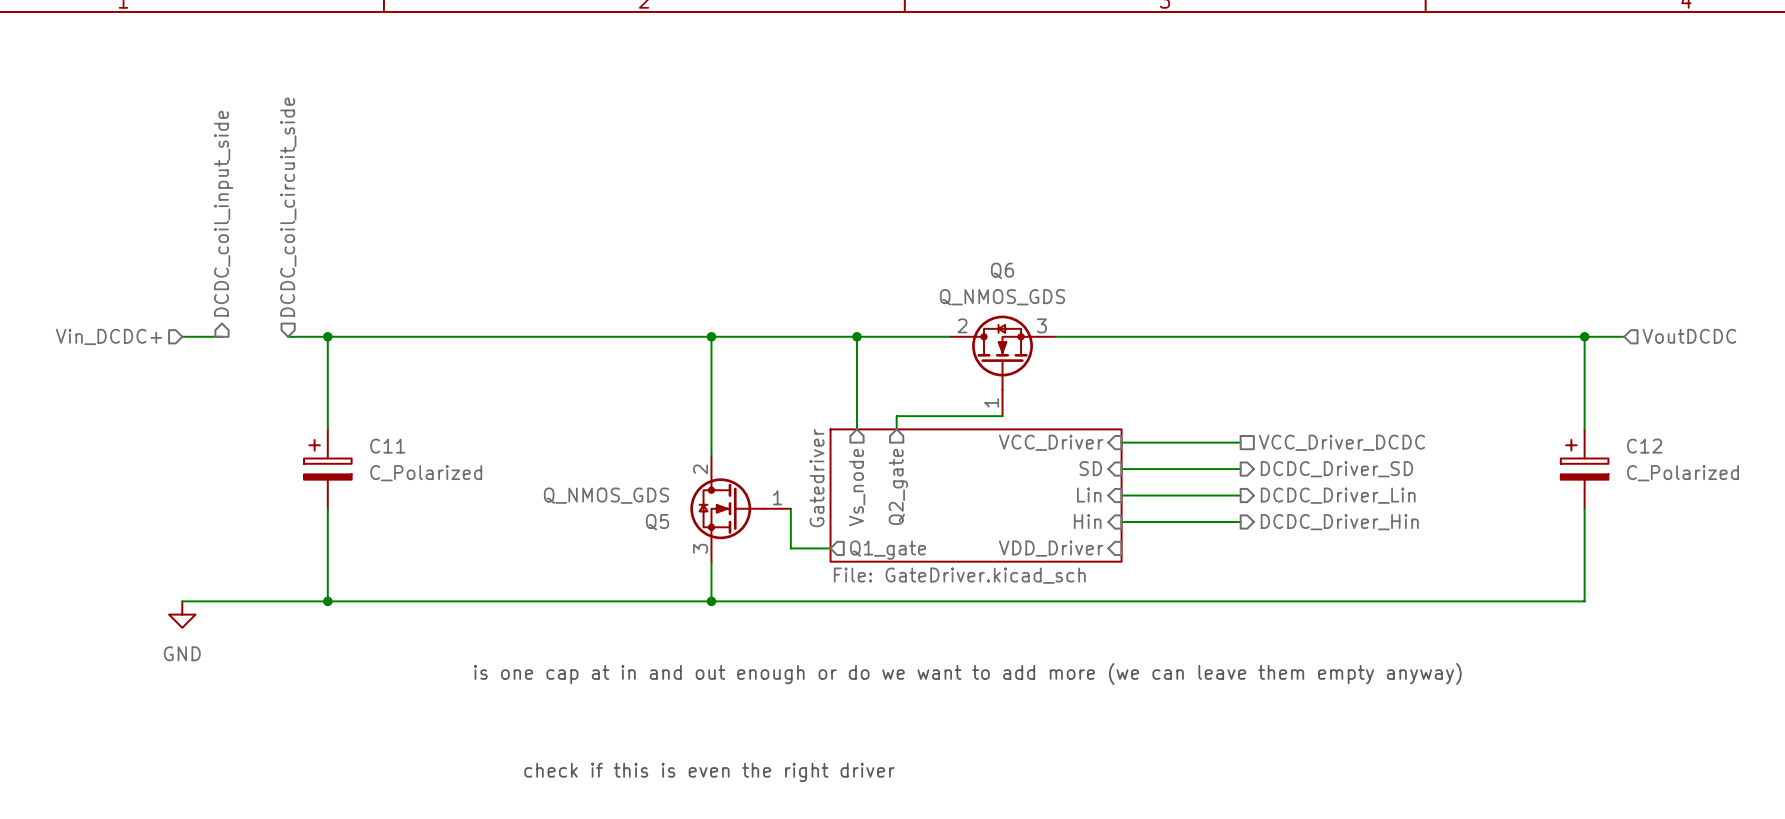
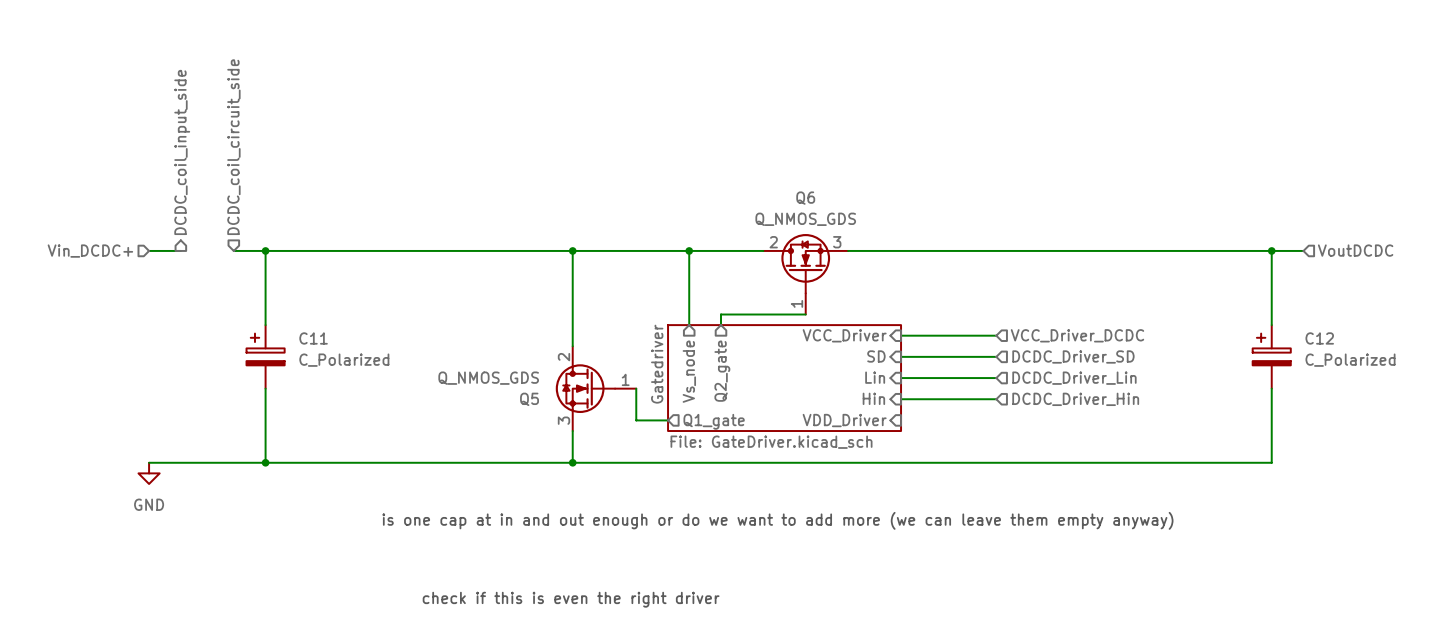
hierarchical label shape: passive (1341, 442) -> input (1077, 335)
hierarchical label shape: output (1336, 469) -> input (1073, 356)
hierarchical label shape: output (1338, 495) -> input (1074, 378)
hierarchical label shape: output (1339, 522) -> input (1075, 399)

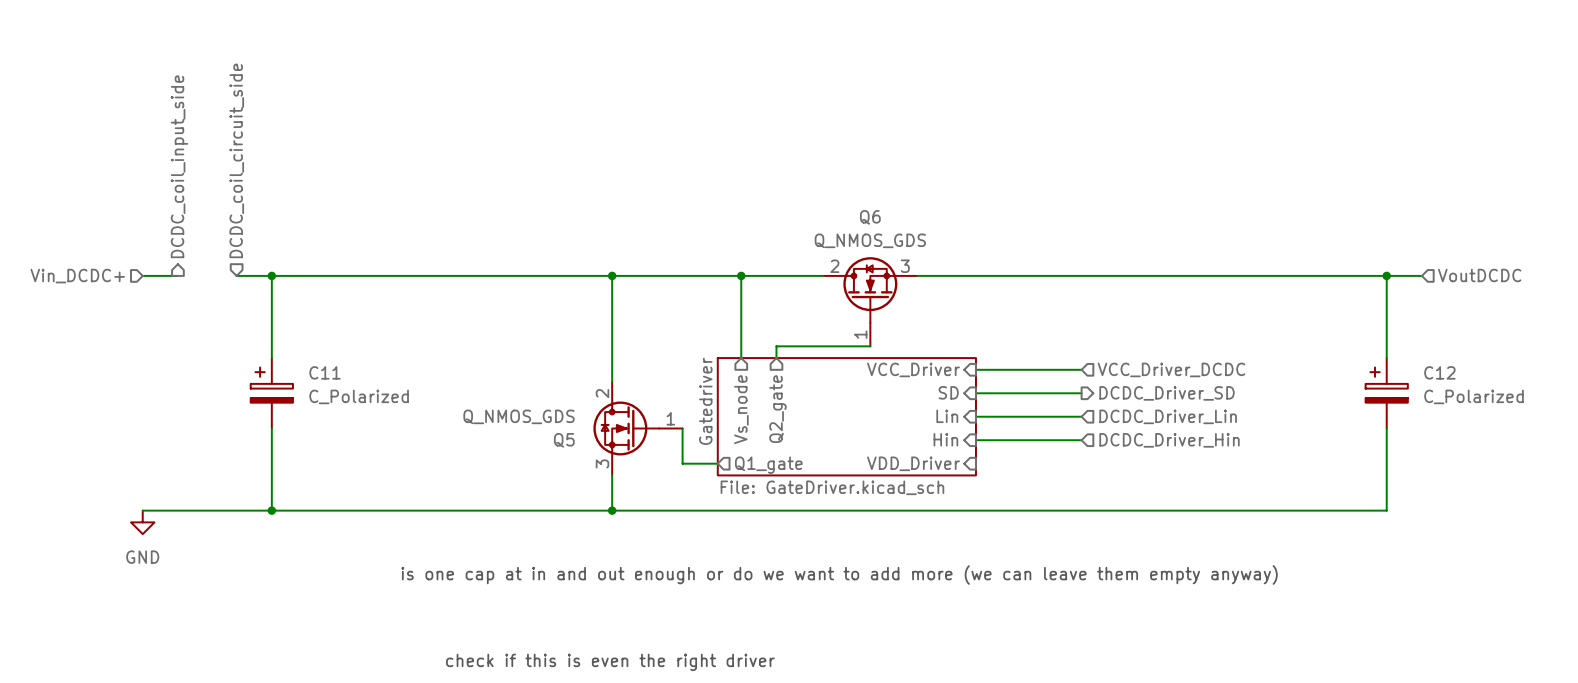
hierarchical label shape: input (1073, 356) -> output (1167, 393)

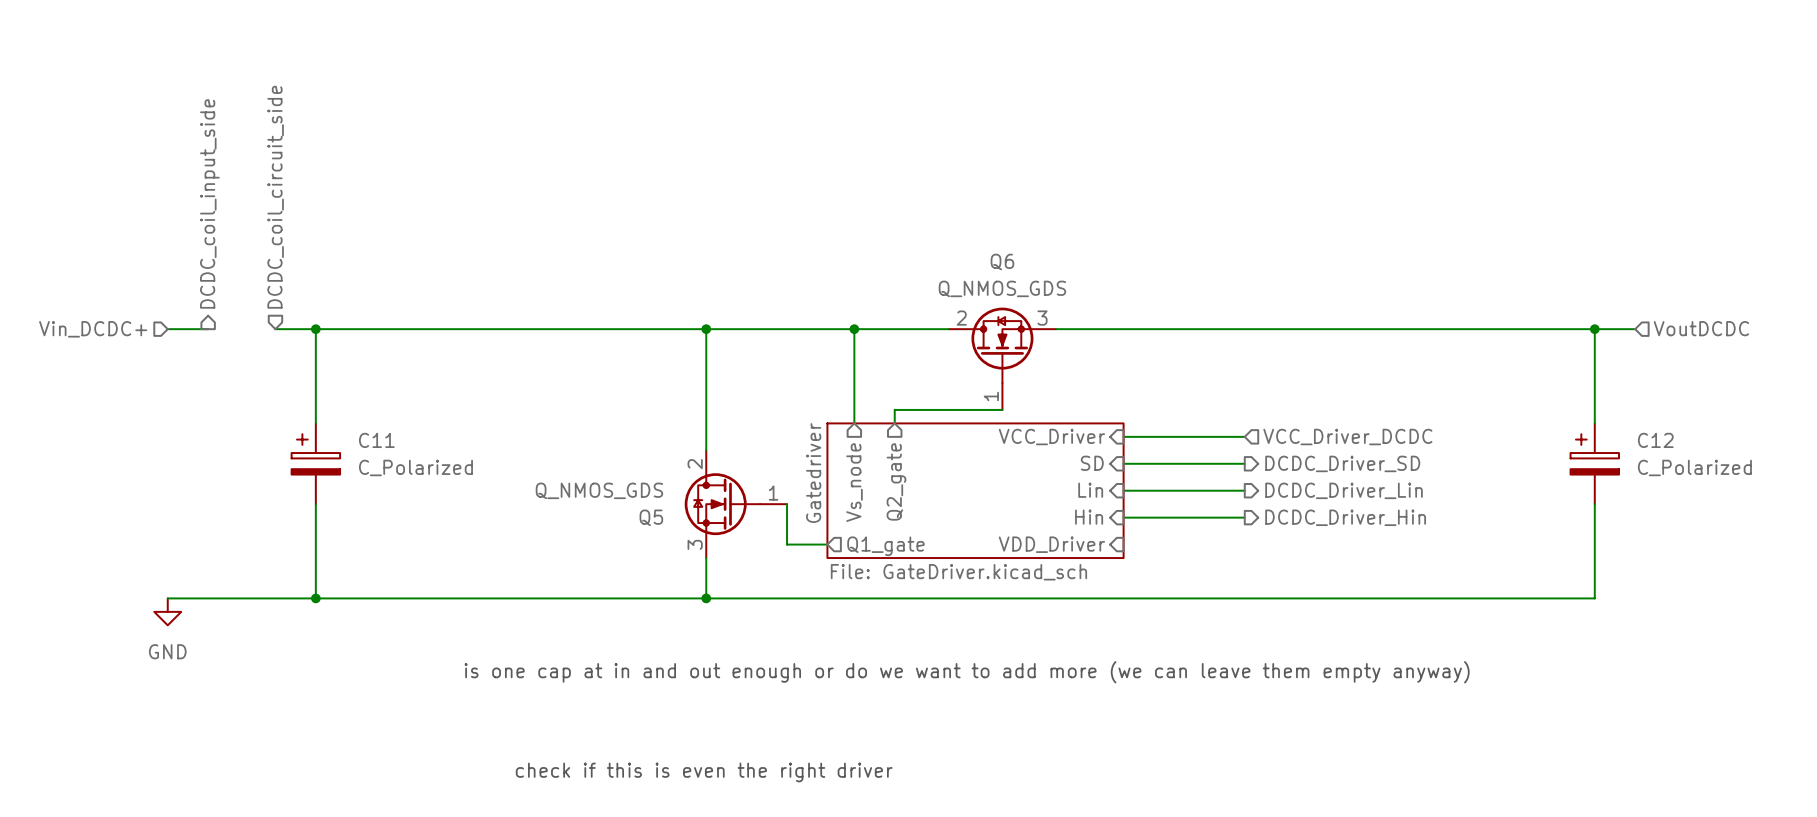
hierarchical label shape: input (1168, 416) -> output (1344, 490)
hierarchical label shape: input (1169, 440) -> output (1345, 517)

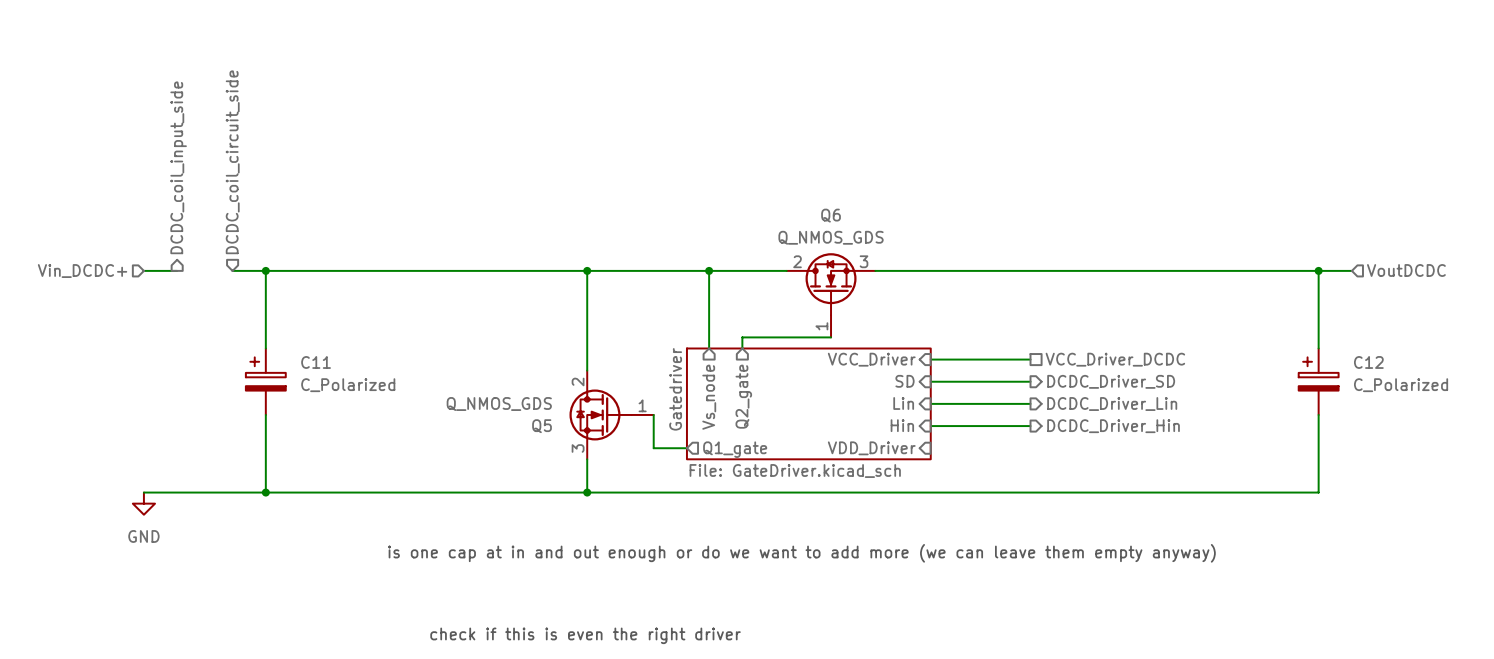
hierarchical label shape: input (1347, 437) -> passive (1115, 359)

